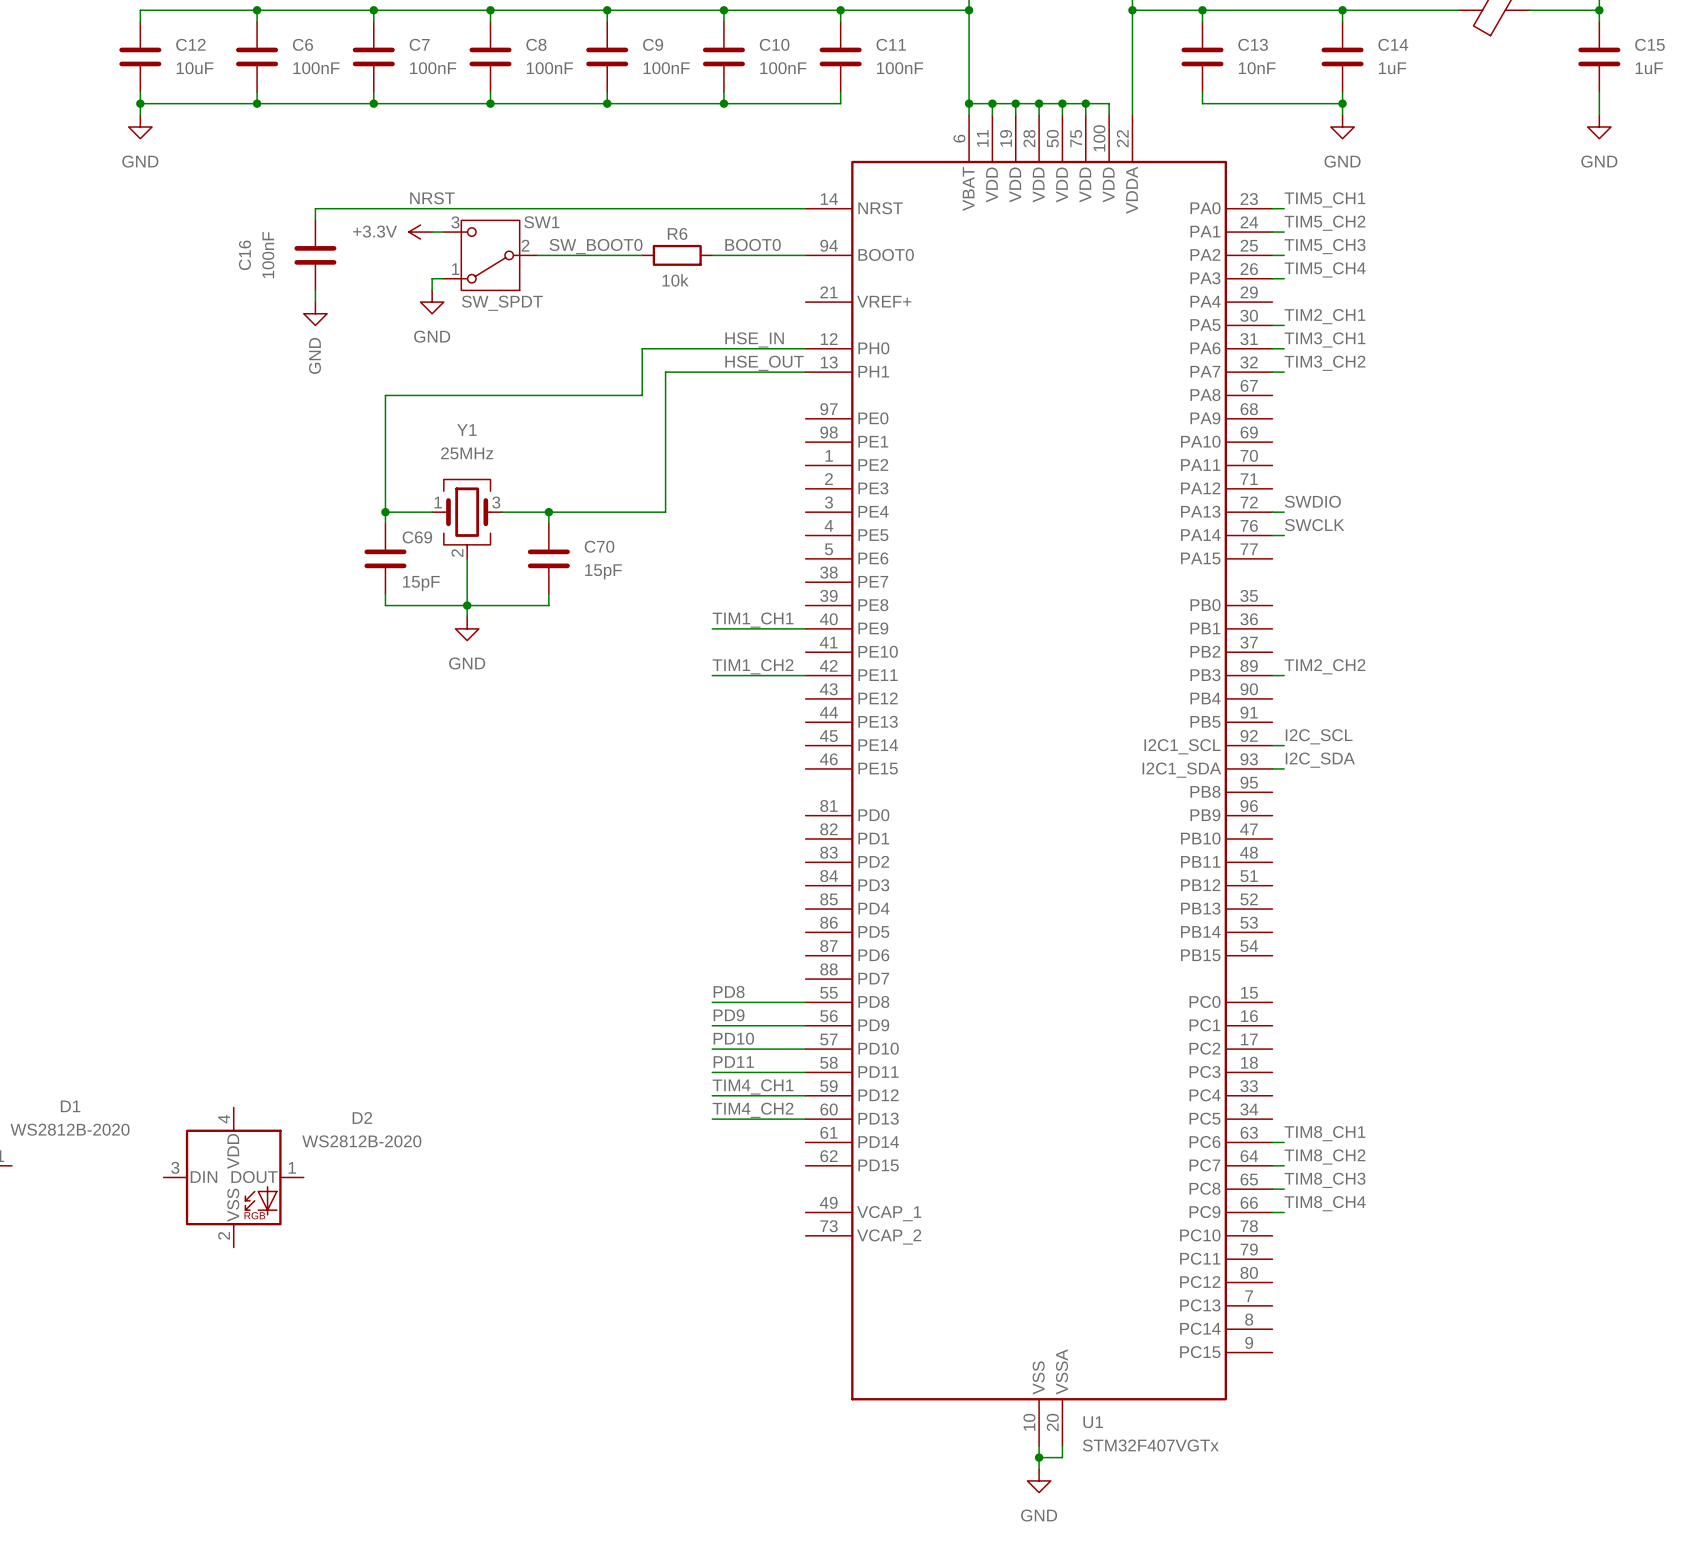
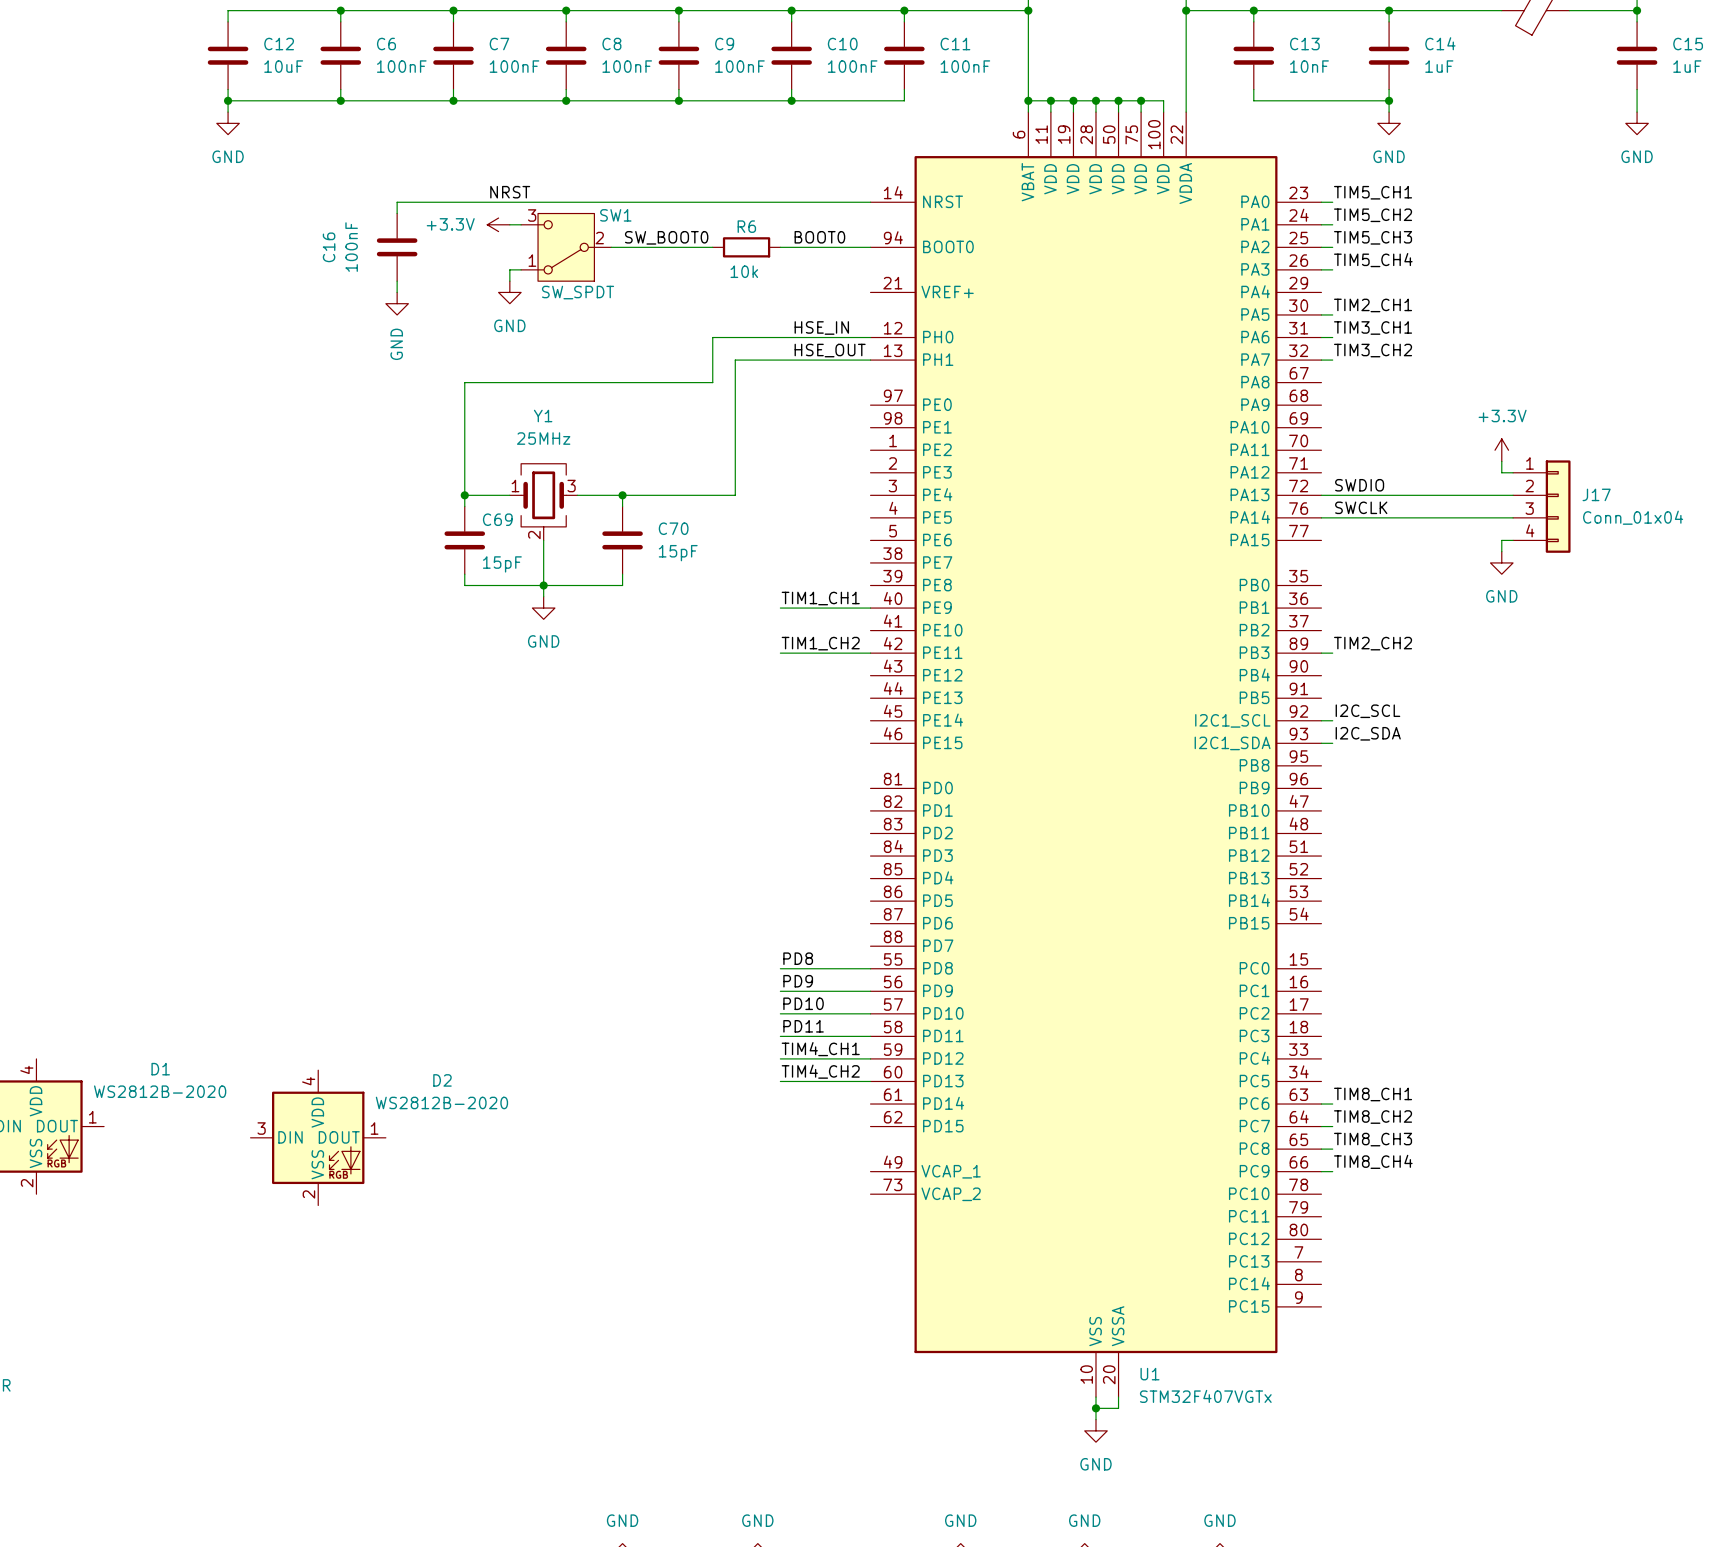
power symbol: none -> +3.3V (1501, 450)
wire: none -> (1501, 461) (1501, 472) (1513, 472)
wire: none -> (1332, 495) (1513, 495)
J17: none -> Conn_01x04 (1541, 506)
wire: none -> (1332, 517) (1513, 517)
wire: none -> (1513, 540) (1501, 540) (1501, 551)
power symbol: none -> GND (1501, 562)

